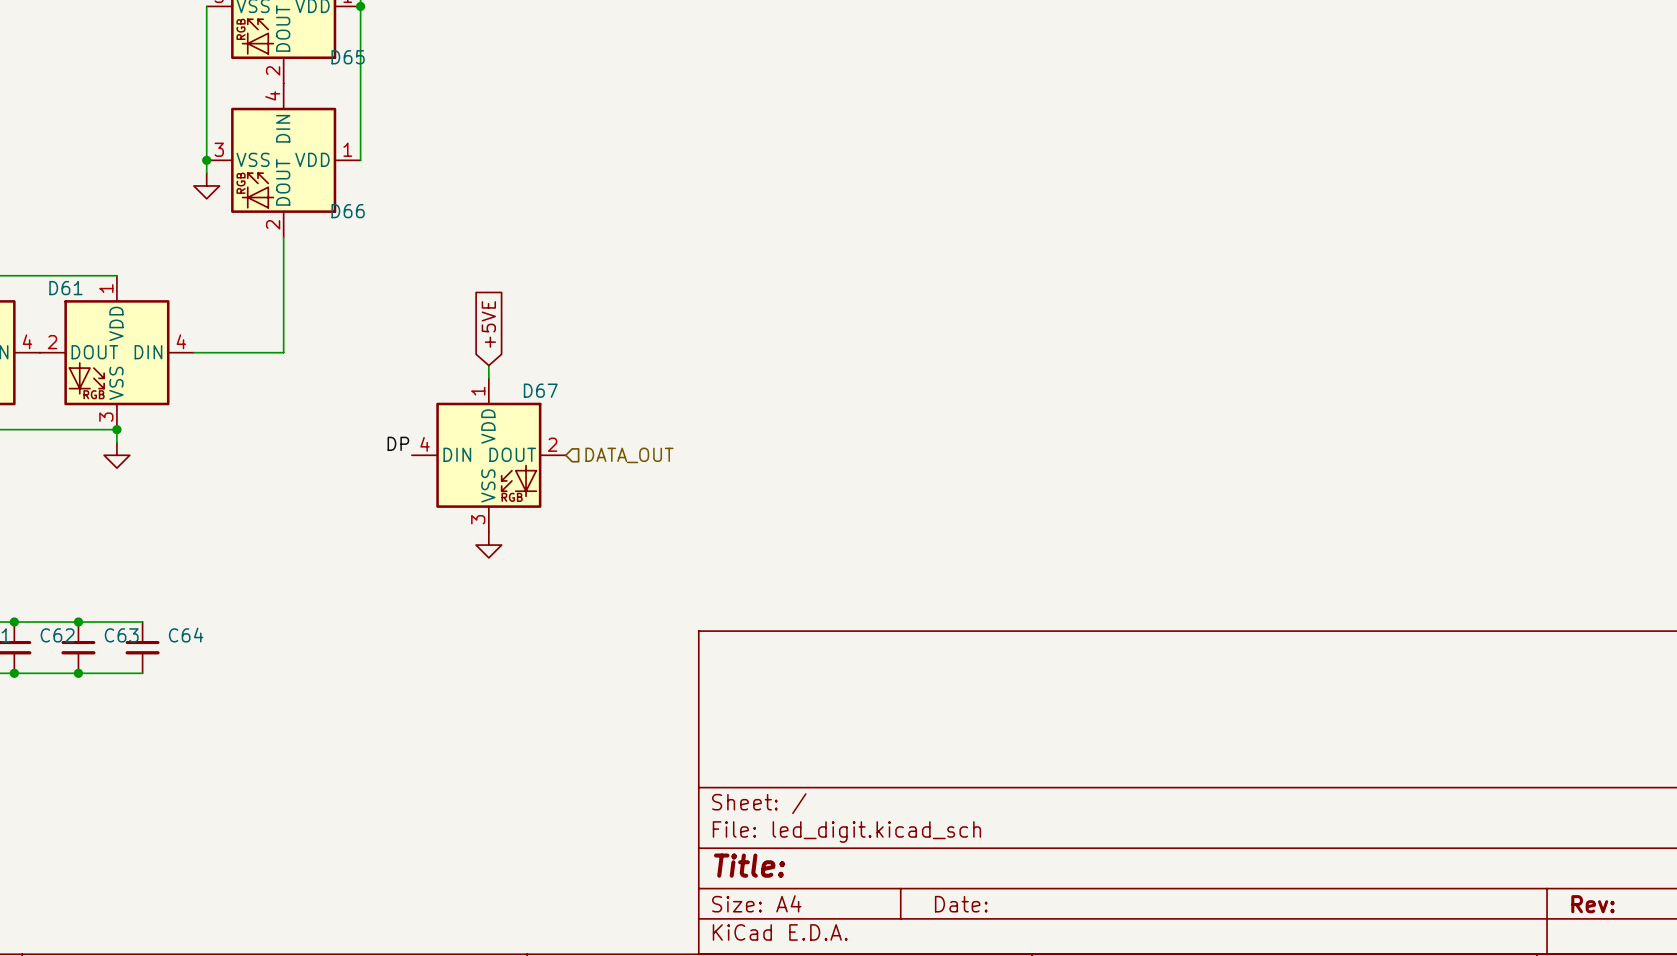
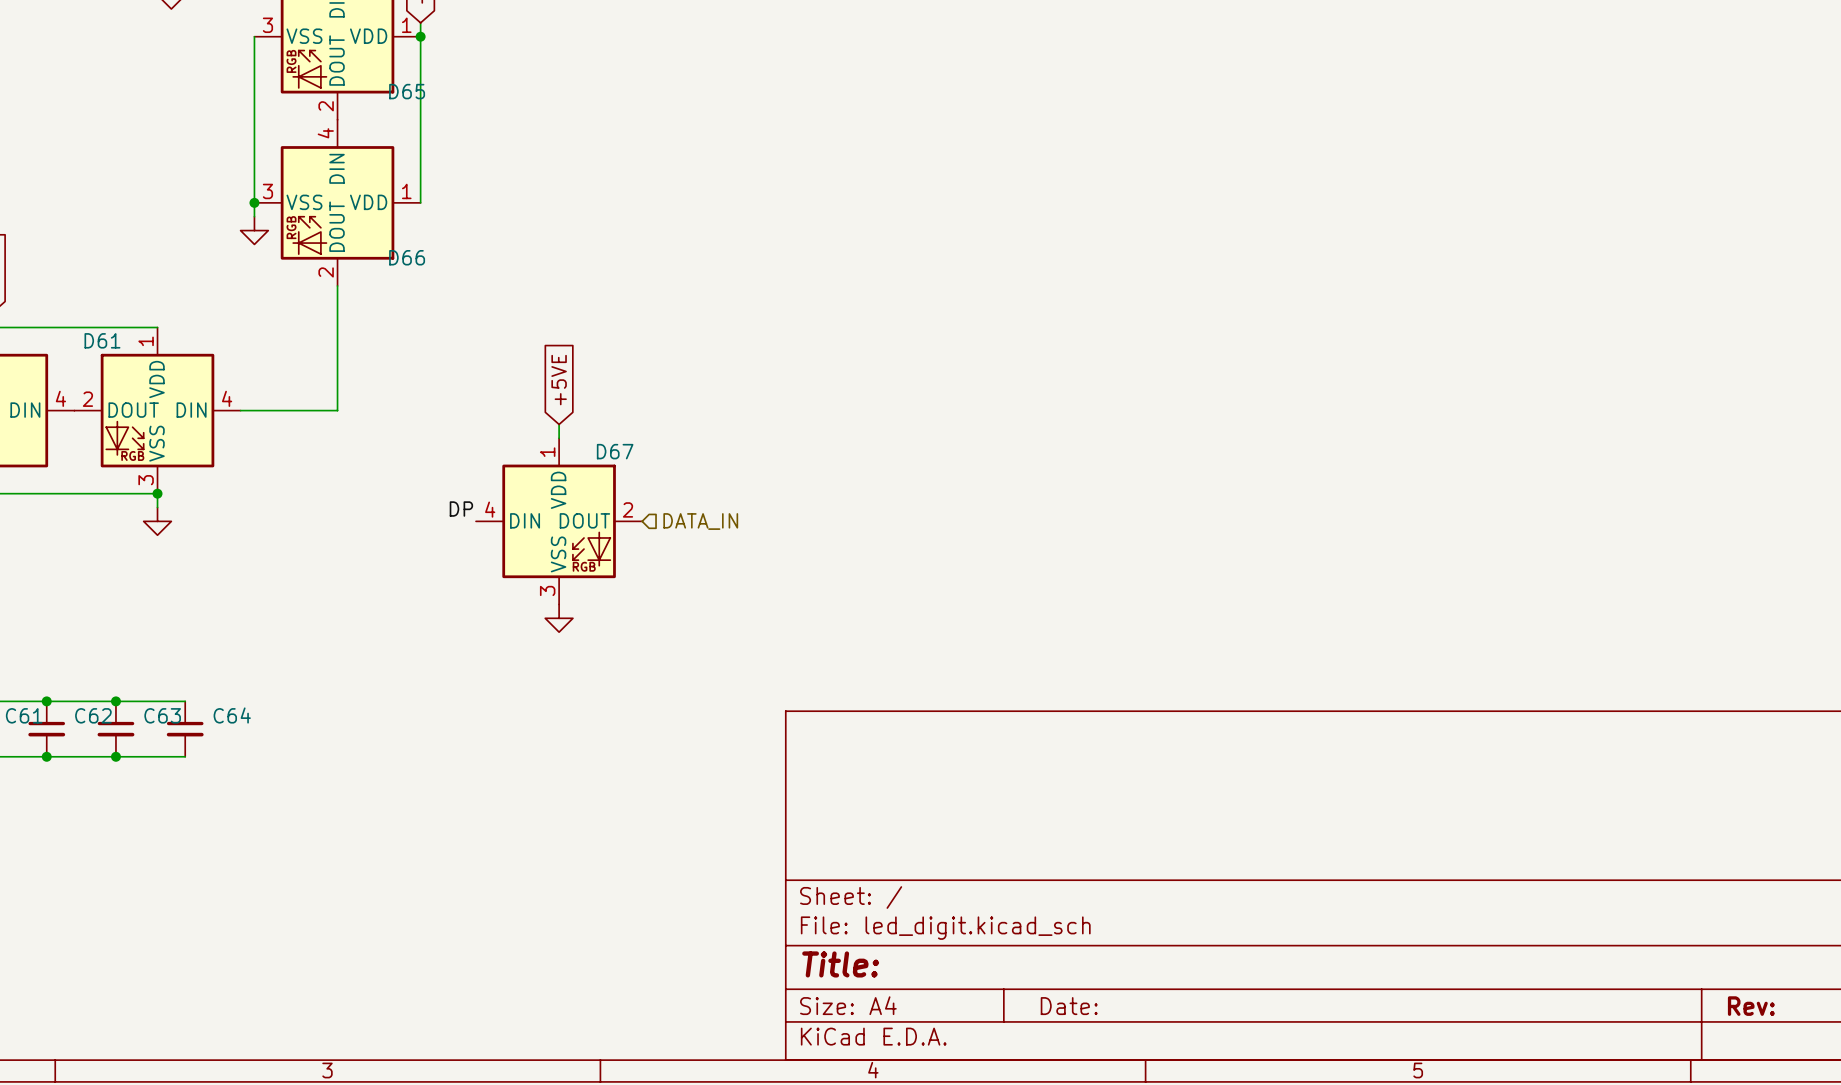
hierarchical label: DATA_OUT (629, 455) -> DATA_IN (700, 521)

